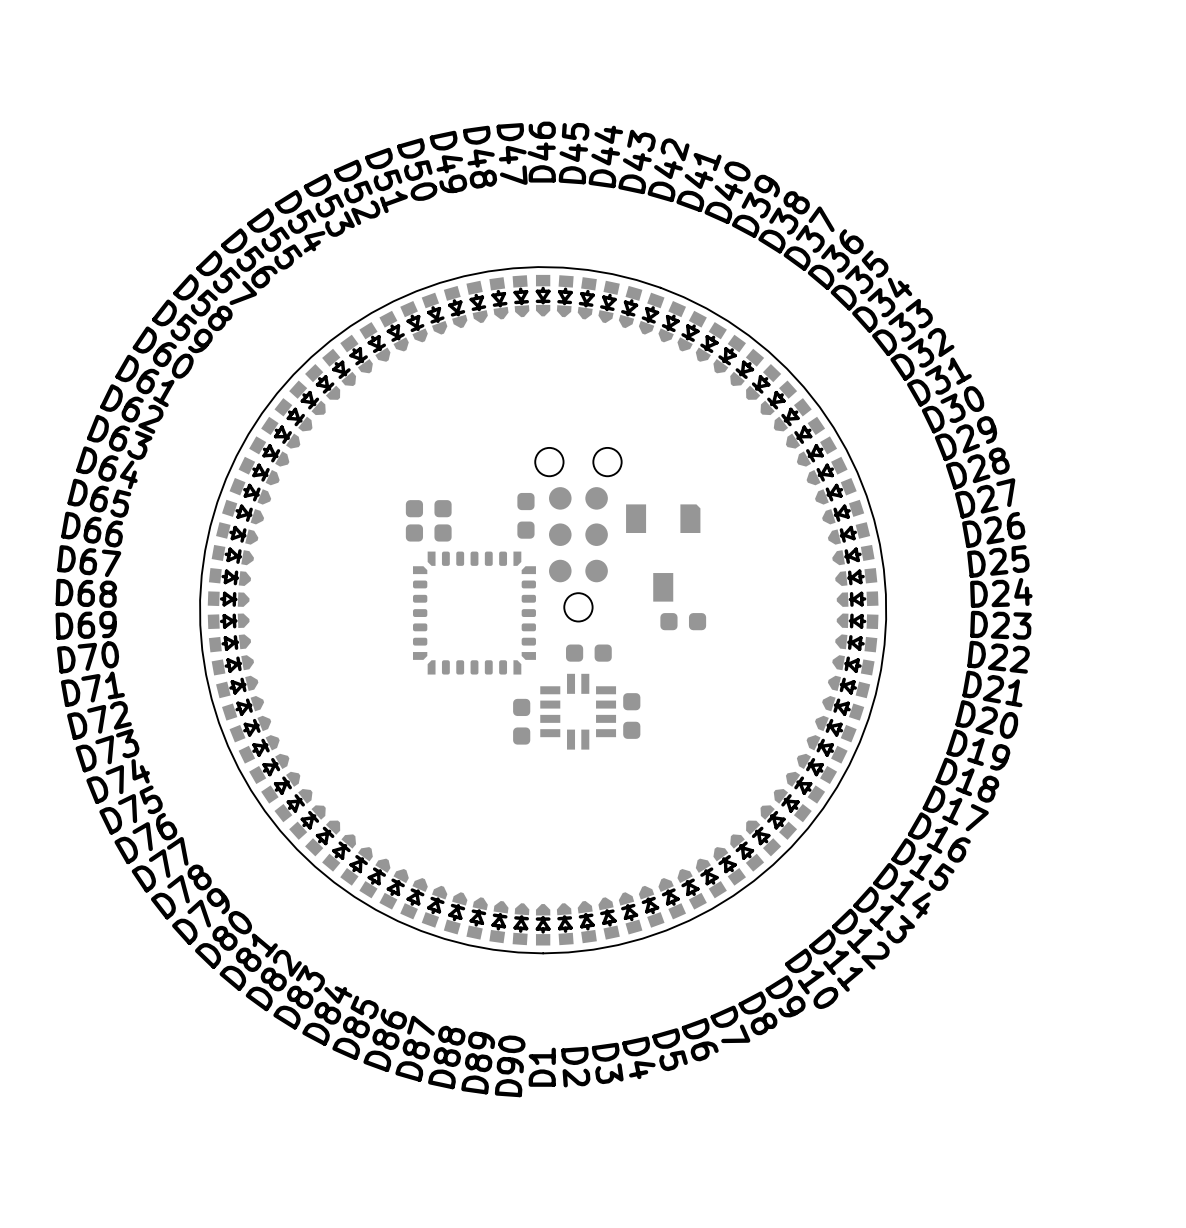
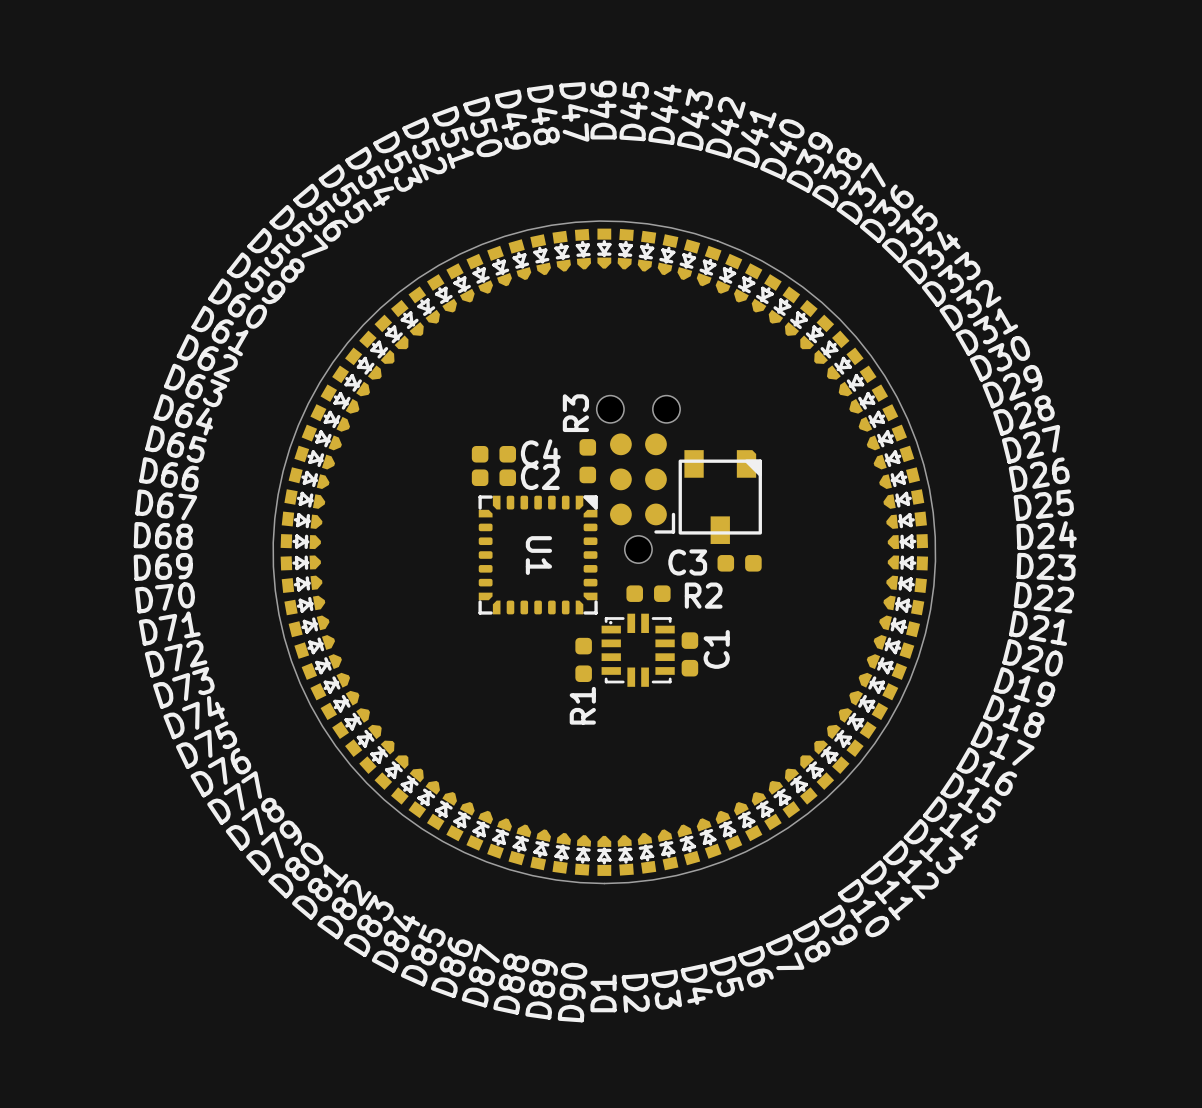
part footprint: [535, 447, 622, 622] -> [596, 395, 681, 564]
R3 name: none -> R3 (575, 413)
part footprint: [626, 504, 701, 602] -> [678, 450, 762, 544]
C4 name: none -> C4 (540, 452)
C2 name: none -> C2 (540, 476)
part: (474, 613) -> none
U1: none -> (538, 555)
C3 name: none -> C3 (687, 562)
R2 name: none -> R2 (703, 595)
part footprint: [540, 673, 617, 750] -> [601, 613, 675, 687]
C1 name: none -> C1 (716, 649)
R1 name: none -> R1 (582, 705)

